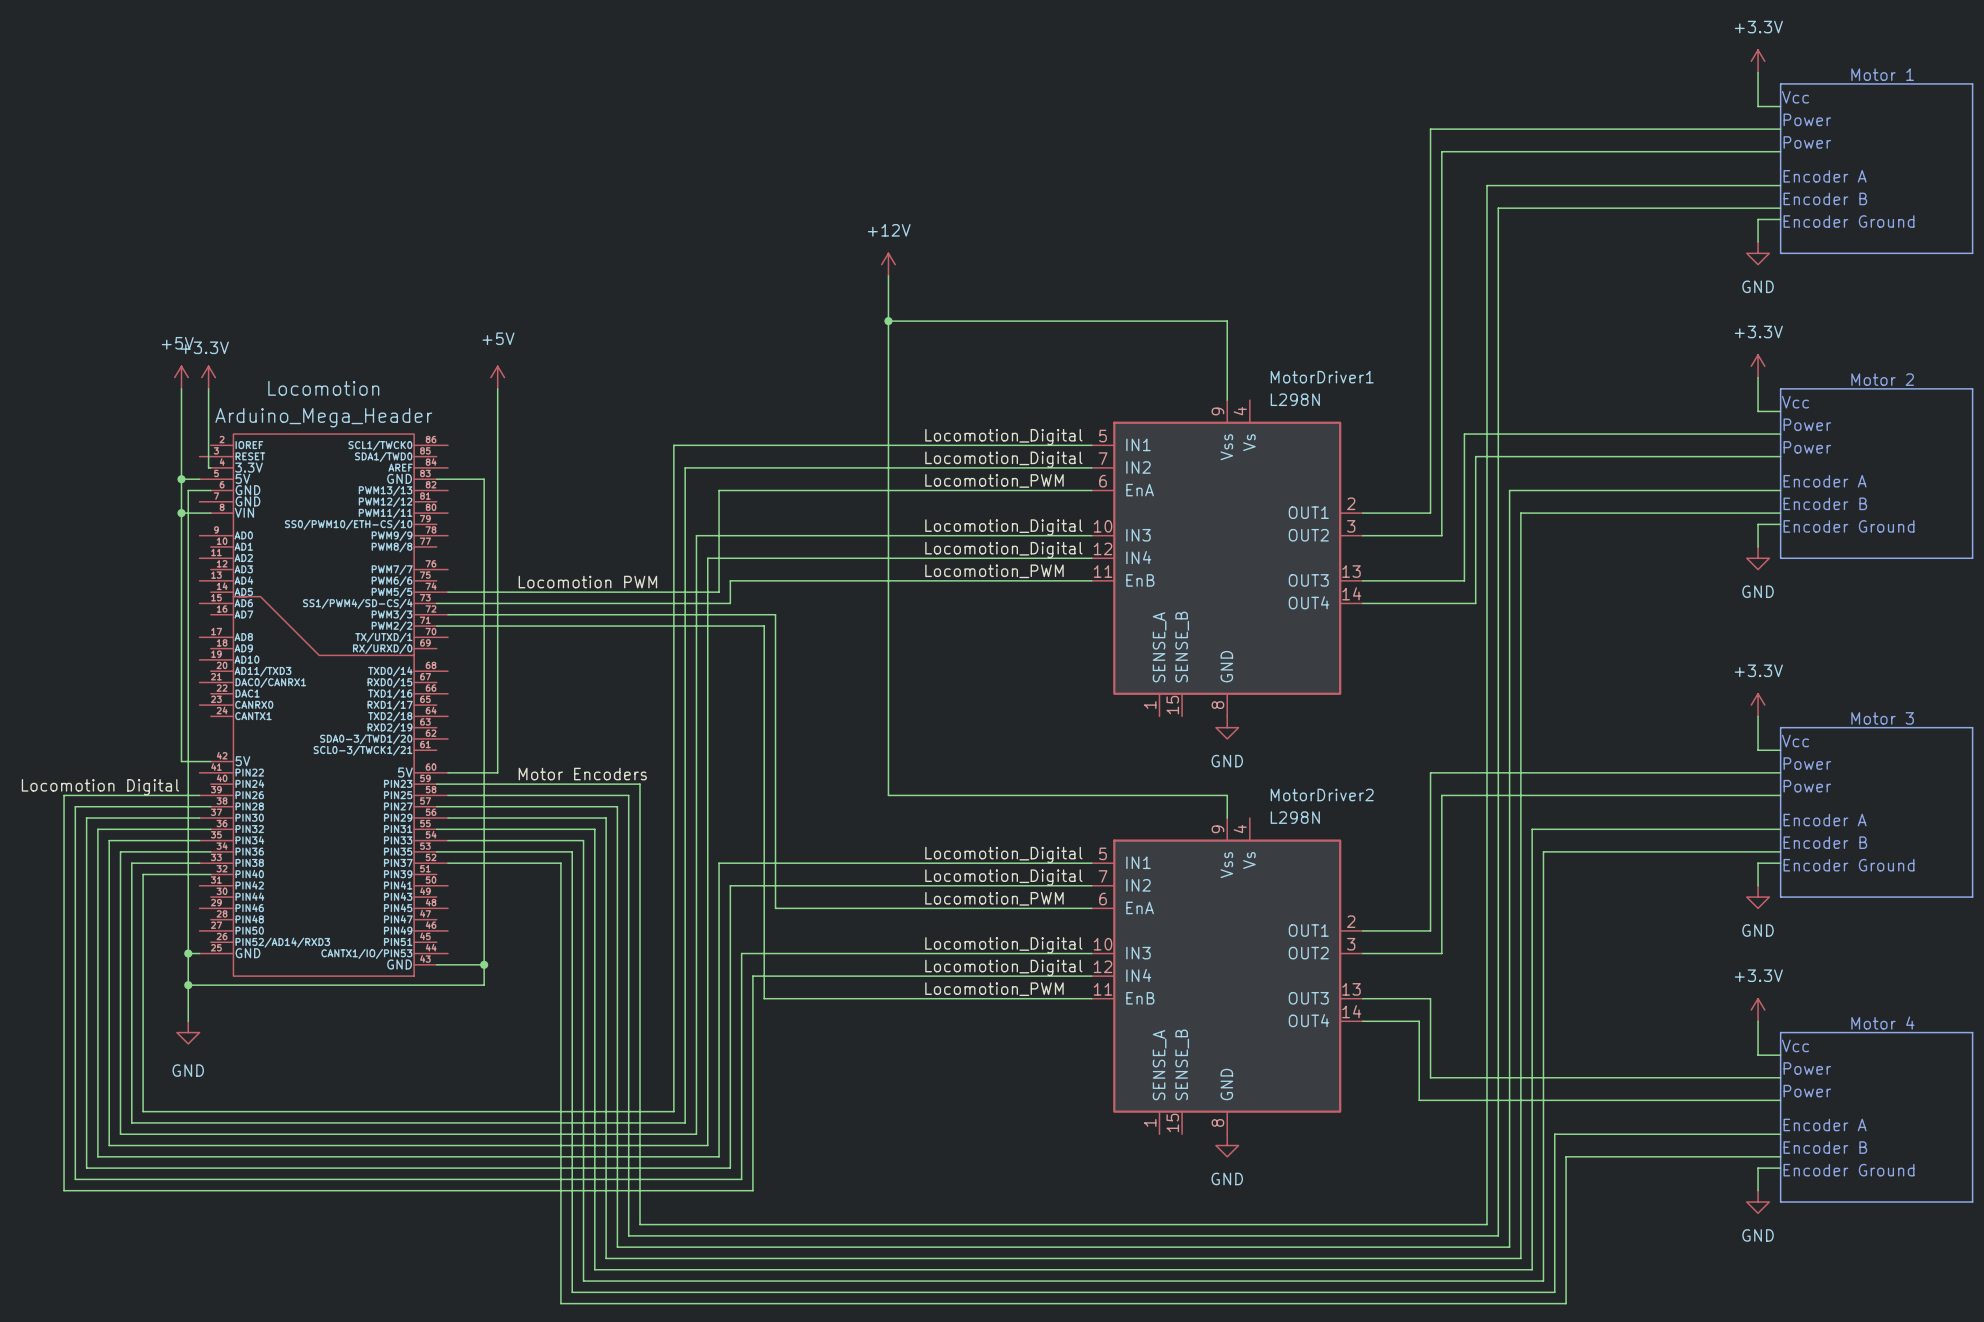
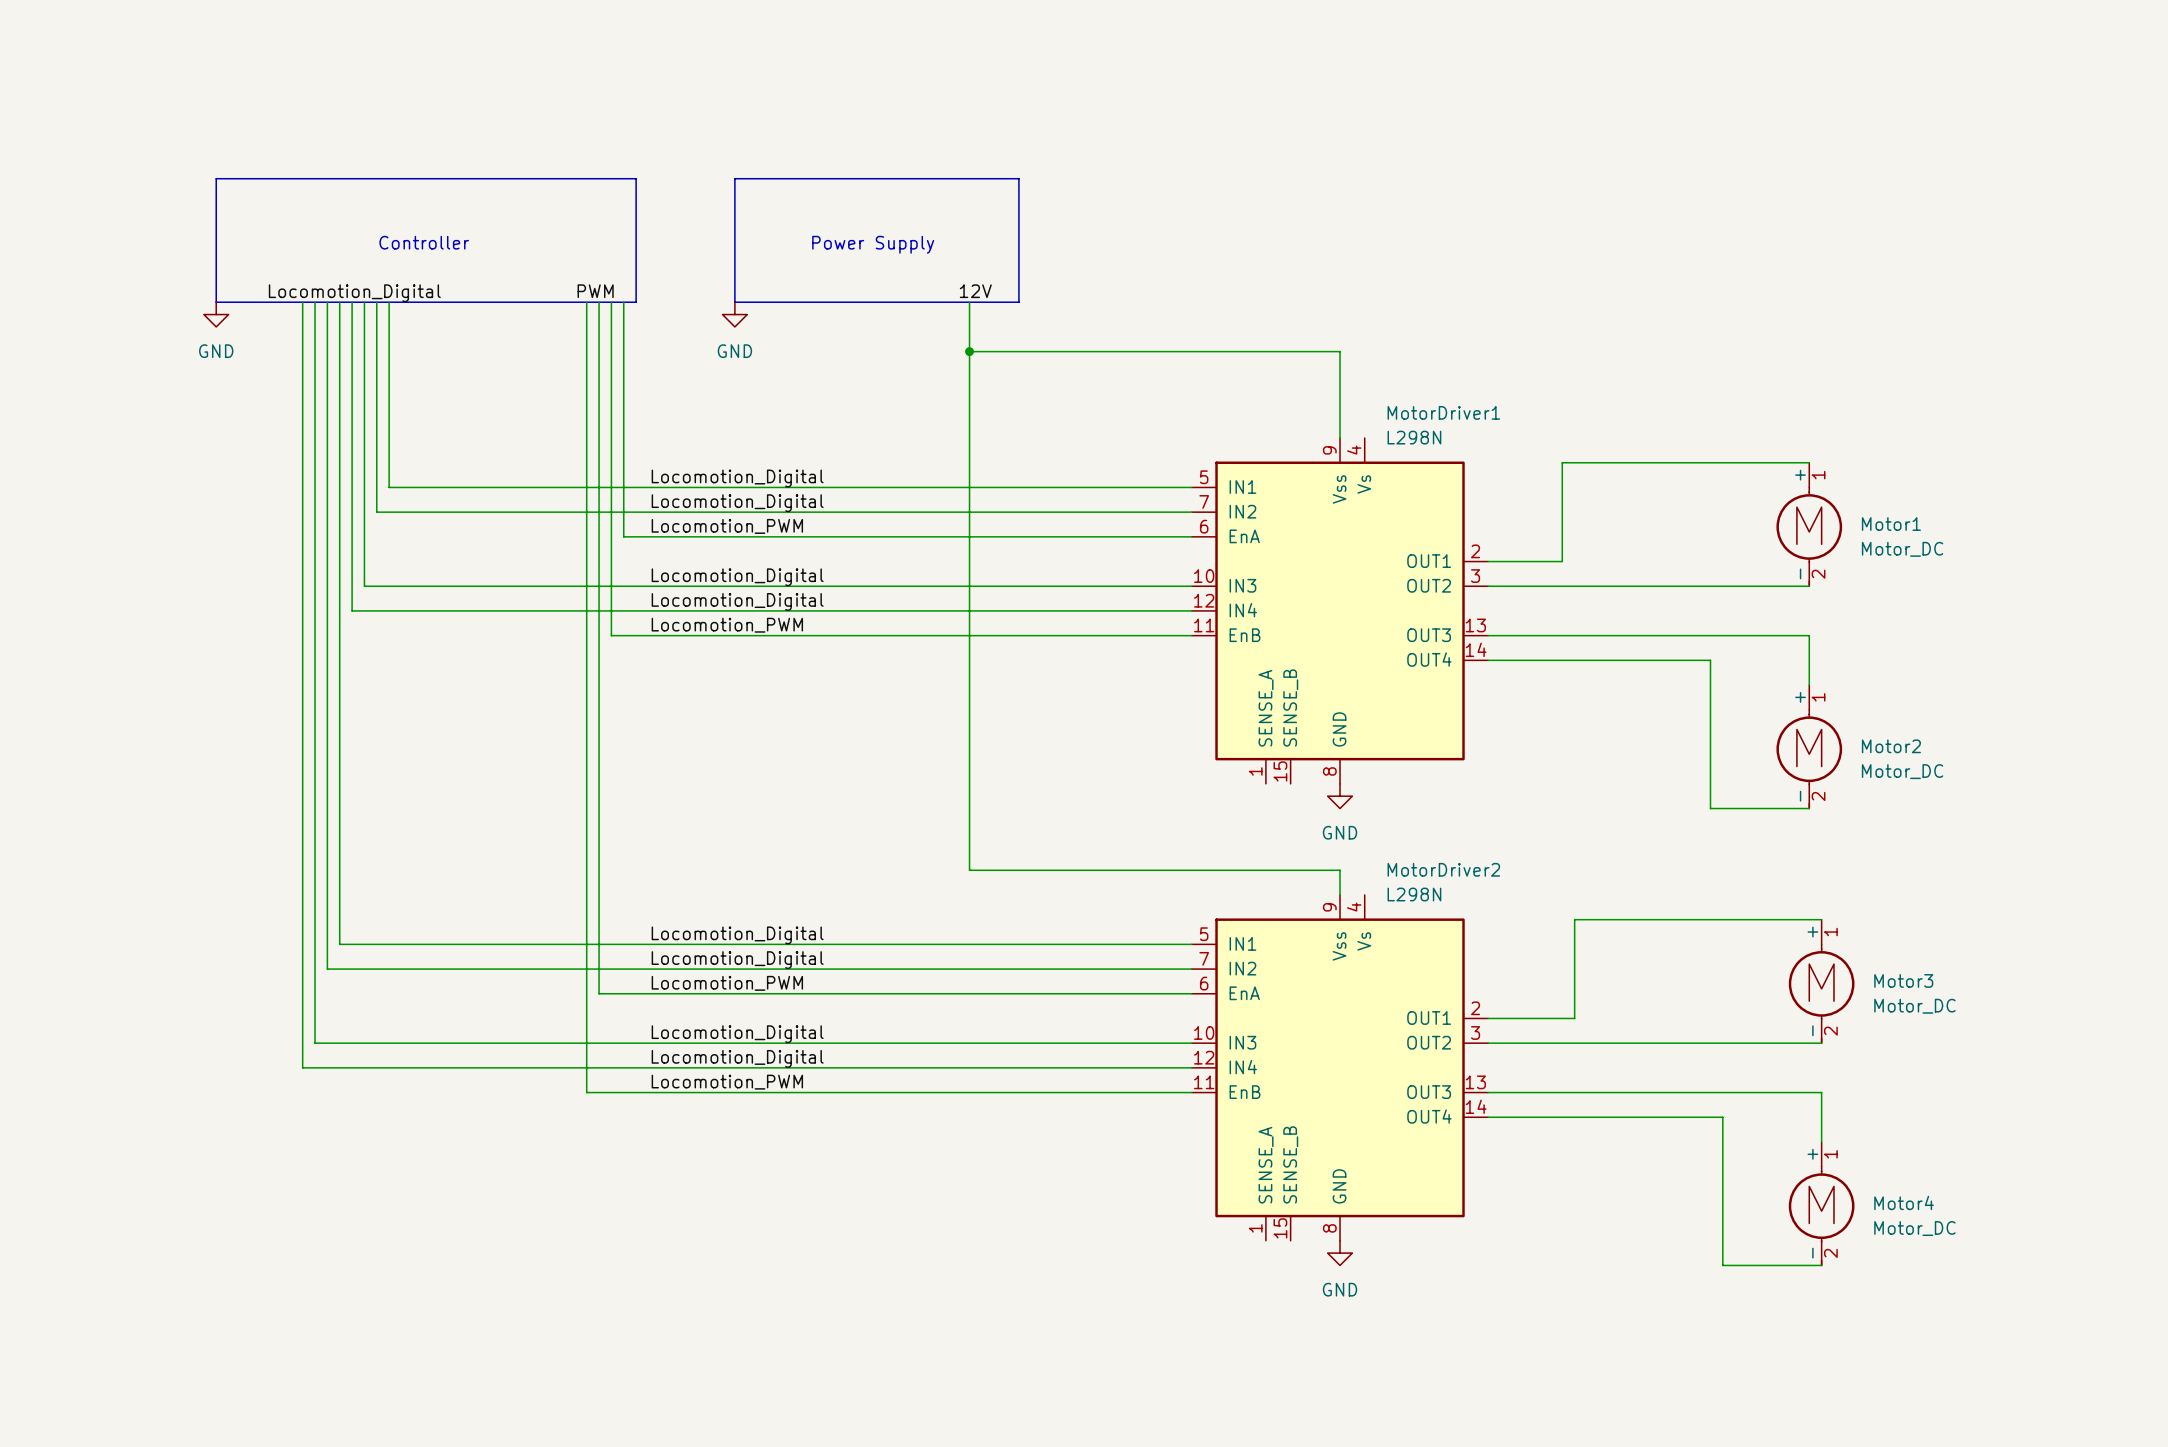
power symbol: +3.3V (1758, 61) -> none
wire: (1758, 72) (1758, 106) (1780, 106) -> none
text: Motor 1 (1882, 74) -> none
line: (1780, 83) (1780, 253) (1972, 253) (1972, 83) (1780, 83) -> none
text: Vcc (1795, 97) -> none
text: Power (1807, 119) -> none
wire: (1780, 129) (1430, 129) (1430, 422) -> (1809, 462) (1562, 462)
text: Power (1807, 142) -> none
wire: (1780, 151) (1441, 151) (1441, 535) -> (1809, 586) (1574, 586)
line: none -> (216, 178) (636, 178) (636, 302) (216, 302) (216, 178)
line: none -> (734, 178) (1018, 178) (1018, 302) (734, 302) (734, 178)
text: Encoder A (1825, 176) -> none
wire: (1780, 185) (1487, 185) (1487, 1224) (639, 1224) (639, 784) (436, 784) -> none
text: Encoder B (1825, 198) -> none
wire: (1780, 208) (1498, 208) (1498, 1235) (628, 1235) (628, 795) (448, 795) -> none
wire: (1780, 219) (1758, 219) (1758, 242) -> none
text: none -> Controller (424, 242)
text: Encoder Ground (1849, 221) -> none
text: none -> Power Supply (873, 244)
power symbol: GND (1758, 253) -> none
power symbol: +12V (888, 264) -> none
label: none -> PWM (595, 291)
label: none -> 12V (975, 291)
label: none -> Locomotion_Digital (354, 293)
wire: none -> (339, 302) (339, 944) (487, 944)
power symbol: none -> GND (216, 314)
power symbol: none -> GND (734, 314)
power symbol: +3.3V (1758, 366) -> none
power symbol: +5V (181, 377) -> none
power symbol: +3.3V (208, 377) -> none
power symbol: +5V (497, 377) -> none
wire: (1758, 377) (1758, 411) (1780, 411) -> none
text: Motor 2 (1882, 379) -> none
wire: (181, 388) (181, 761) (210, 761) -> none
wire: (208, 388) (208, 467) (210, 467) -> none
wire: (497, 388) (497, 772) (448, 772) -> none
line: (1780, 388) (1780, 558) (1972, 558) (1972, 388) (1780, 388) -> none
text: Vcc (1795, 402) -> none
text: Power (1807, 424) -> none
wire: (1780, 434) (1464, 434) (1464, 580) -> (1809, 685) (1809, 635) (1599, 635)
label: none -> Locomotion_Digital (737, 478)
label: Locomotion_Digital (1003, 437) -> none
wire: (673, 445) (673, 1111) (143, 1111) (143, 874) (210, 874) -> (734, 487) (389, 487) (389, 302)
text: Power (1807, 447) -> none
wire: (1780, 456) (1475, 456) (1475, 603) -> (1809, 808) (1710, 808) (1710, 660) (1611, 660)
label: none -> Locomotion_Digital (737, 503)
label: Locomotion_Digital (1003, 459) -> none
wire: (685, 467) (685, 1122) (131, 1122) (131, 863) (199, 863) -> (747, 512) (376, 512) (376, 302)
wire: (181, 479) (199, 479) -> none
junction: (181, 479) -> none
wire: (436, 479) (484, 479) (484, 985) (188, 985) -> none
Motor1: none -> Motor_DC (1809, 524)
label: none -> Locomotion_PWM (727, 526)
label: Locomotion_PWM (994, 480) -> none
text: Encoder A (1825, 481) -> none
wire: (210, 490) (188, 490) (188, 1021) -> none
wire: (719, 490) (719, 592) (448, 592) -> (784, 536) (623, 536) (623, 302)
wire: (1780, 490) (1509, 490) (1509, 1247) (617, 1247) (617, 806) (436, 806) -> none
text: Encoder B (1825, 503) -> none
wire: (181, 513) (210, 513) -> none
junction: (181, 513) -> none
wire: (1780, 513) (1520, 513) (1520, 1258) (606, 1258) (606, 818) (448, 818) -> none
wire: (1780, 524) (1758, 524) (1758, 546) -> none
text: Encoder Ground (1849, 526) -> none
label: none -> Locomotion_Digital (737, 577)
label: Locomotion_Digital (1003, 527) -> none
wire: (696, 535) (696, 1134) (120, 1134) (120, 851) (210, 851) -> (759, 586) (364, 586) (364, 302)
label: none -> Locomotion_Digital (737, 601)
label: Locomotion_Digital (1003, 550) -> none
wire: (707, 558) (707, 1145) (109, 1145) (109, 840) (199, 840) -> (771, 610) (352, 610) (352, 302)
power symbol: GND (1758, 558) -> none
label: Locomotion_PWM (994, 571) -> none
wire: (730, 580) (730, 603) (436, 603) -> (796, 635) (611, 635) (611, 302)
label: Locomotion PWM (587, 582) -> Locomotion_PWM (727, 625)
wire: (448, 614) (775, 614) (775, 908) -> (599, 302) (599, 993) (846, 993)
wire: (436, 626) (764, 626) (764, 998) -> (586, 302) (586, 1092) (833, 1092)
Motor2: none -> Motor_DC (1809, 746)
Locomotion: Arduino_Mega_Header (323, 705) -> none
power symbol: +3.3V (1758, 705) -> none
wire: (1758, 716) (1758, 750) (1780, 750) -> none
text: Motor 3 (1882, 718) -> none
line: (1780, 727) (1780, 897) (1972, 897) (1972, 727) (1780, 727) -> none
text: Vcc (1795, 741) -> none
text: Power (1807, 763) -> none
wire: (1780, 772) (1430, 772) (1430, 930) -> none
label: Motor Encoders (582, 774) -> none
text: Power (1807, 786) -> none
label: Locomotion Digital (100, 787) -> none
wire: (199, 795) (64, 795) (64, 1190) (752, 1190) (752, 976) -> (302, 302) (302, 1067) (821, 1067)
wire: (1780, 795) (1441, 795) (1441, 840) -> (1821, 919) (1574, 919)
wire: (210, 806) (75, 806) (75, 1179) (741, 1179) (741, 953) -> (315, 302) (315, 1043) (809, 1043)
wire: (199, 818) (86, 818) (86, 1168) (730, 1168) (730, 885) -> (327, 302) (327, 969) (796, 969)
text: Encoder A (1825, 820) -> none
wire: (210, 829) (97, 829) (97, 1156) (719, 1156) (719, 863) -> (611, 944) (784, 944)
wire: (436, 829) (594, 829) (594, 1269) (1532, 1269) (1532, 829) (1780, 829) -> none
wire: (448, 840) (583, 840) (583, 1281) (1543, 1281) (1543, 851) (1780, 851) -> none
text: Encoder B (1825, 842) -> none
wire: (436, 851) (572, 851) (572, 1292) (1554, 1292) (1554, 1134) (1780, 1134) -> none
label: none -> Locomotion_Digital (737, 935)
label: Locomotion_Digital (1003, 854) -> none
wire: (560, 863) (560, 1303) (1566, 1303) (1566, 1156) (1577, 1156) -> none
wire: (1780, 863) (1758, 863) (1758, 885) -> none
text: Encoder Ground (1849, 865) -> none
label: none -> Locomotion_Digital (737, 960)
label: Locomotion_Digital (1003, 877) -> none
Motor3: none -> Motor_DC (1821, 981)
power symbol: GND (1758, 897) -> none
label: none -> Locomotion_PWM (727, 983)
label: Locomotion_PWM (994, 898) -> none
wire: (1441, 930) (1441, 953) -> (1574, 1018) (1562, 1018)
label: none -> Locomotion_Digital (737, 1034)
label: Locomotion_Digital (1003, 945) -> none
wire: (188, 953) (199, 953) -> none
junction: (188, 953) -> none
wire: none -> (1574, 1043) (1821, 1043)
wire: (436, 964) (484, 964) -> none
junction: (484, 964) -> none
label: none -> Locomotion_Digital (737, 1058)
label: Locomotion_Digital (1003, 967) -> none
junction: (188, 985) -> none
label: none -> Locomotion_PWM (727, 1082)
label: Locomotion_PWM (994, 989) -> none
wire: (1430, 998) (1430, 1077) (1780, 1077) -> (1562, 1092) (1821, 1092) (1821, 1141)
power symbol: +3.3V (1758, 1010) -> none
wire: (1419, 1021) (1419, 1100) (1780, 1100) -> (1549, 1117) (1722, 1117) (1722, 1265)
wire: (1758, 1021) (1758, 1055) (1780, 1055) -> none
text: Motor 4 (1882, 1023) -> none
power symbol: GND (188, 1032) -> none
line: (1780, 1032) (1780, 1201) (1972, 1201) (1972, 1032) (1780, 1032) -> none
text: Vcc (1795, 1045) -> none
text: Power (1807, 1068) -> none
text: Power (1807, 1091) -> none
Motor4: none -> Motor_DC (1821, 1203)
text: Encoder A (1825, 1124) -> none
text: Encoder B (1825, 1147) -> none
wire: (1667, 1156) (1780, 1156) -> none
wire: (1780, 1168) (1758, 1168) (1758, 1190) -> none
text: Encoder Ground (1849, 1170) -> none
power symbol: GND (1758, 1201) -> none

